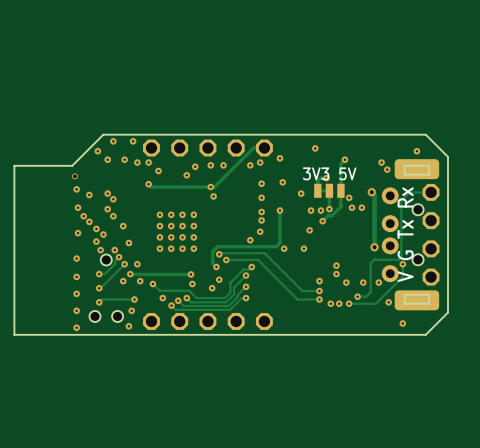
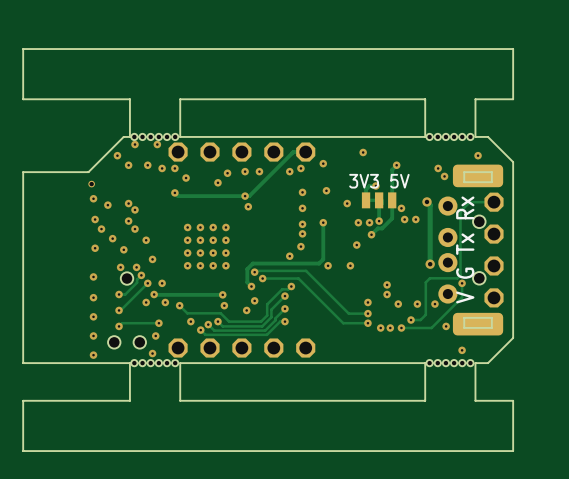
hole: none -> (134, 136)
hole: none -> (142, 136)
hole: none -> (150, 136)
hole: none -> (158, 136)
hole: none -> (167, 136)
hole: none -> (175, 136)
board edge: (153, 134) (108, 134) -> (180, 136) (180, 99) (425, 99) (425, 136)
hole: none -> (429, 136)
hole: none -> (437, 136)
hole: none -> (445, 136)
hole: none -> (454, 136)
hole: none -> (462, 136)
hole: none -> (470, 136)
board edge: (414, 134) (370, 134) -> (475, 136) (475, 99) (513, 99) (513, 49) (23, 49) (23, 99) (129, 99) (129, 136)
via: (89, 221) -> none
via: none -> (112, 238)
via: (96, 228) -> none
via: (96, 241) -> none
hole: none -> (134, 363)
hole: none -> (142, 363)
hole: none -> (150, 363)
hole: none -> (158, 363)
hole: none -> (167, 363)
hole: none -> (175, 363)
board edge: (153, 334) (108, 334) -> (180, 363) (180, 400) (425, 400) (425, 363)
hole: none -> (429, 363)
hole: none -> (437, 363)
hole: none -> (445, 363)
hole: none -> (454, 363)
hole: none -> (462, 363)
hole: none -> (470, 363)
board edge: (414, 334) (370, 334) -> (475, 363) (475, 400) (513, 400) (513, 451) (23, 451) (23, 400) (129, 400) (129, 363)

